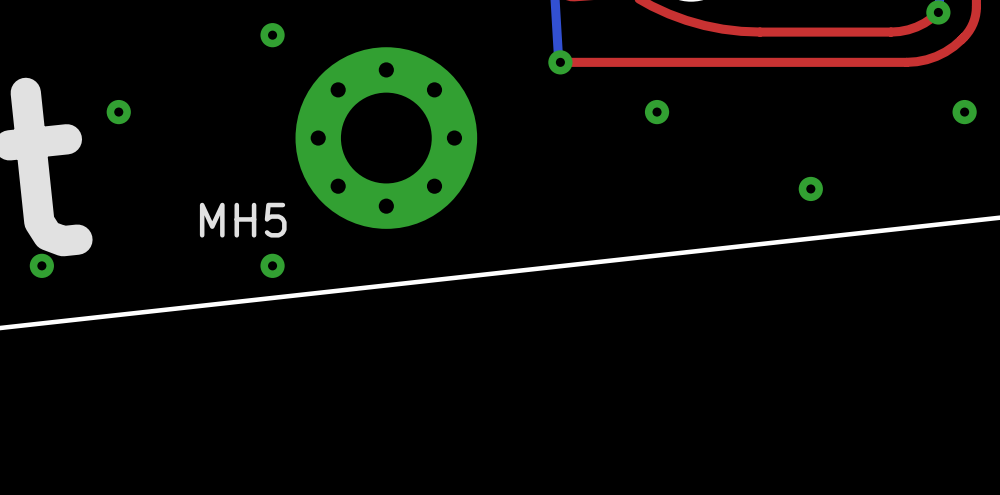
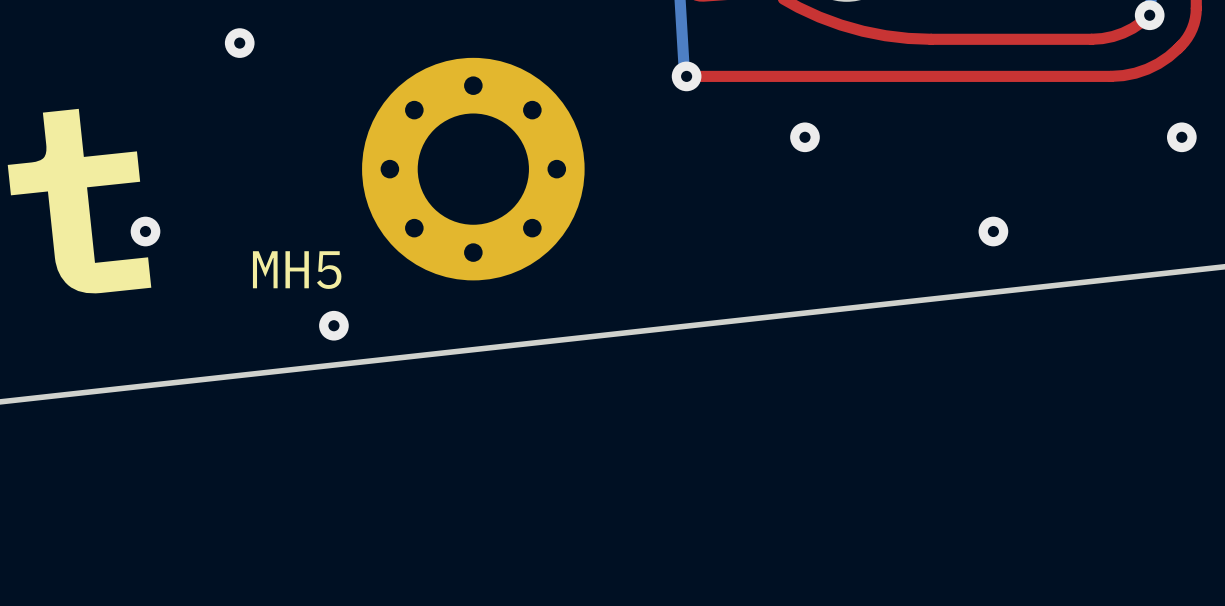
via: none -> (239, 43)
via: (272, 35) -> none
via: (118, 112) -> none
via: none -> (145, 231)
via: (41, 265) -> none

